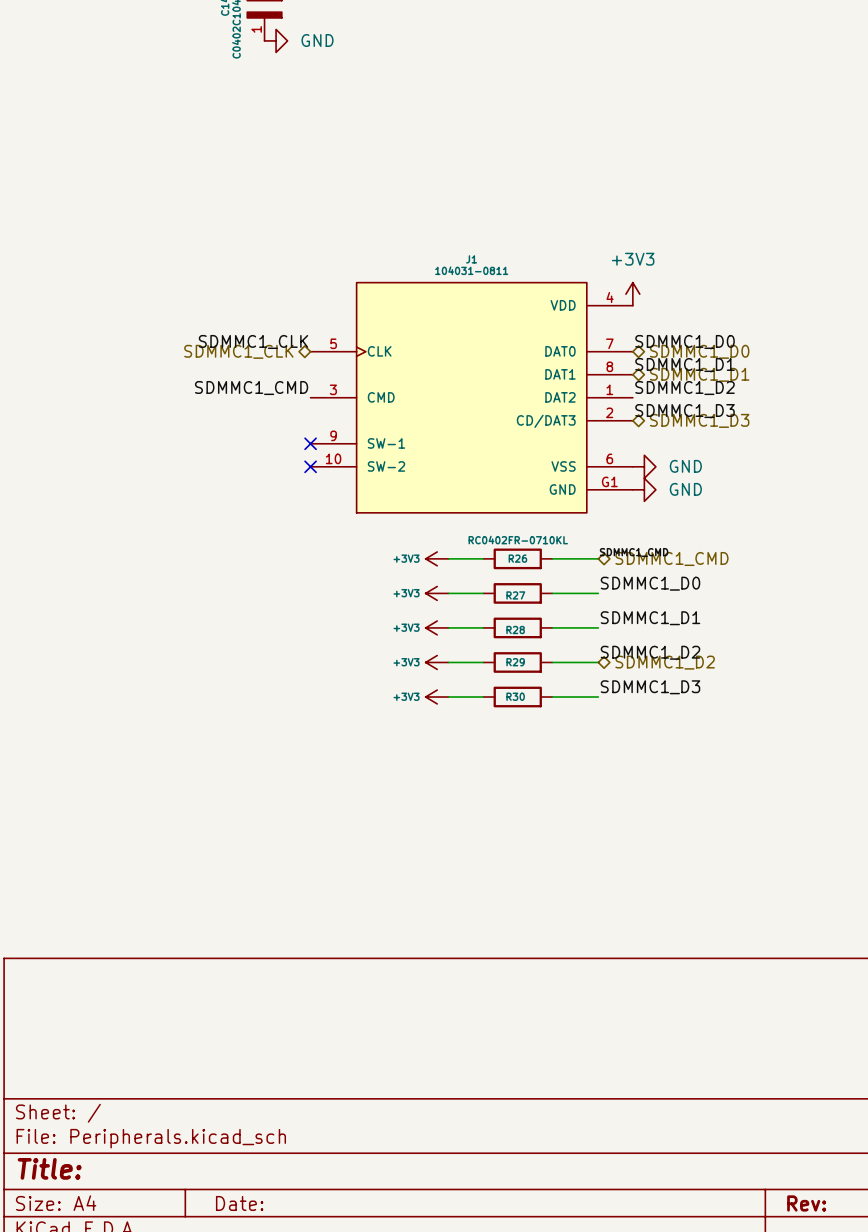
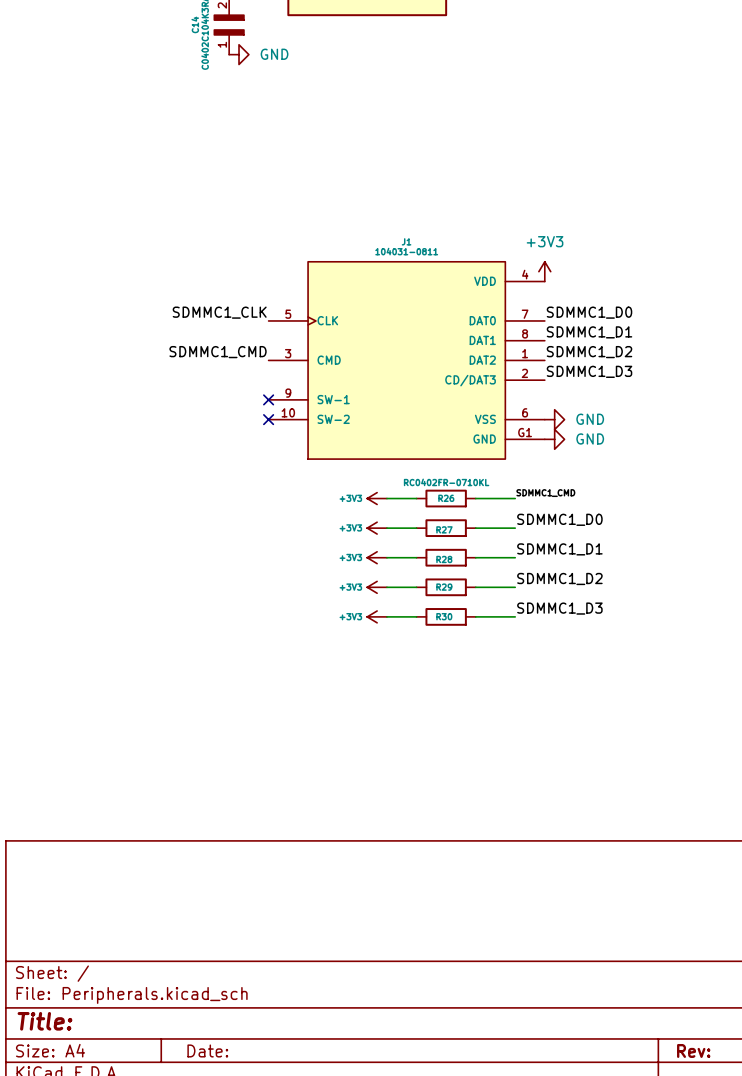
hierarchical label: SDMMC1_CLK (238, 351) -> none
hierarchical label: SDMMC1_D0 (699, 351) -> none
hierarchical label: SDMMC1_D1 (699, 374) -> none
hierarchical label: SDMMC1_D3 (699, 420) -> none
hierarchical label: SDMMC1_CMD (671, 559) -> none
hierarchical label: SDMMC1_D2 (665, 662) -> none

